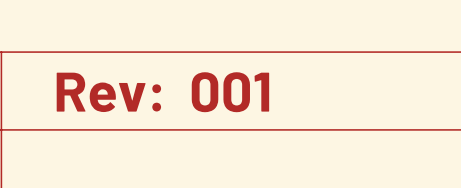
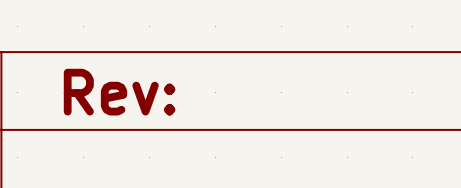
title block: Rev: 001 (162, 92) -> Rev: (119, 92)

